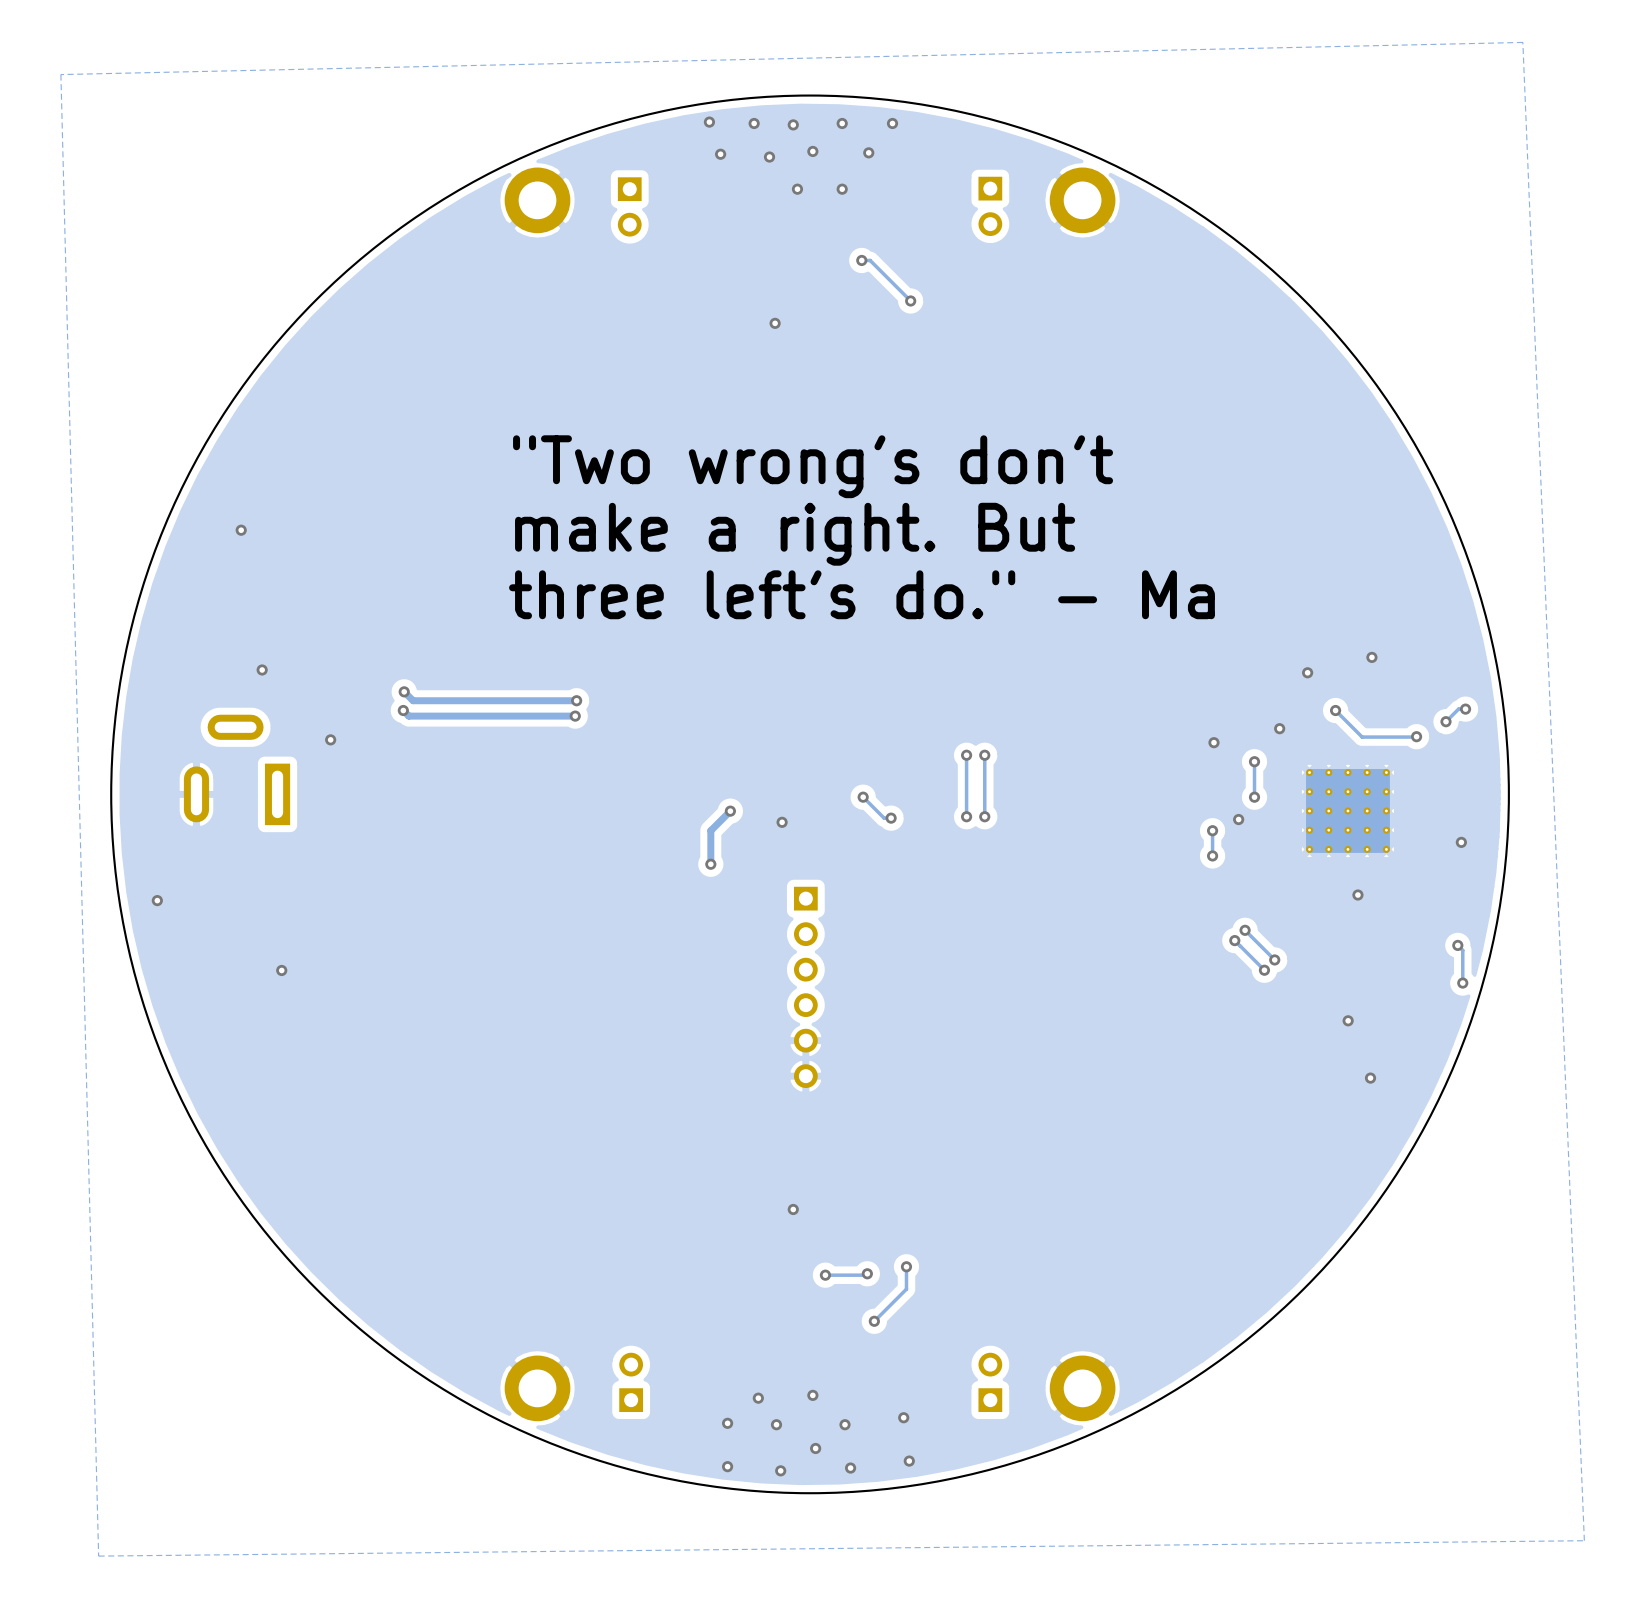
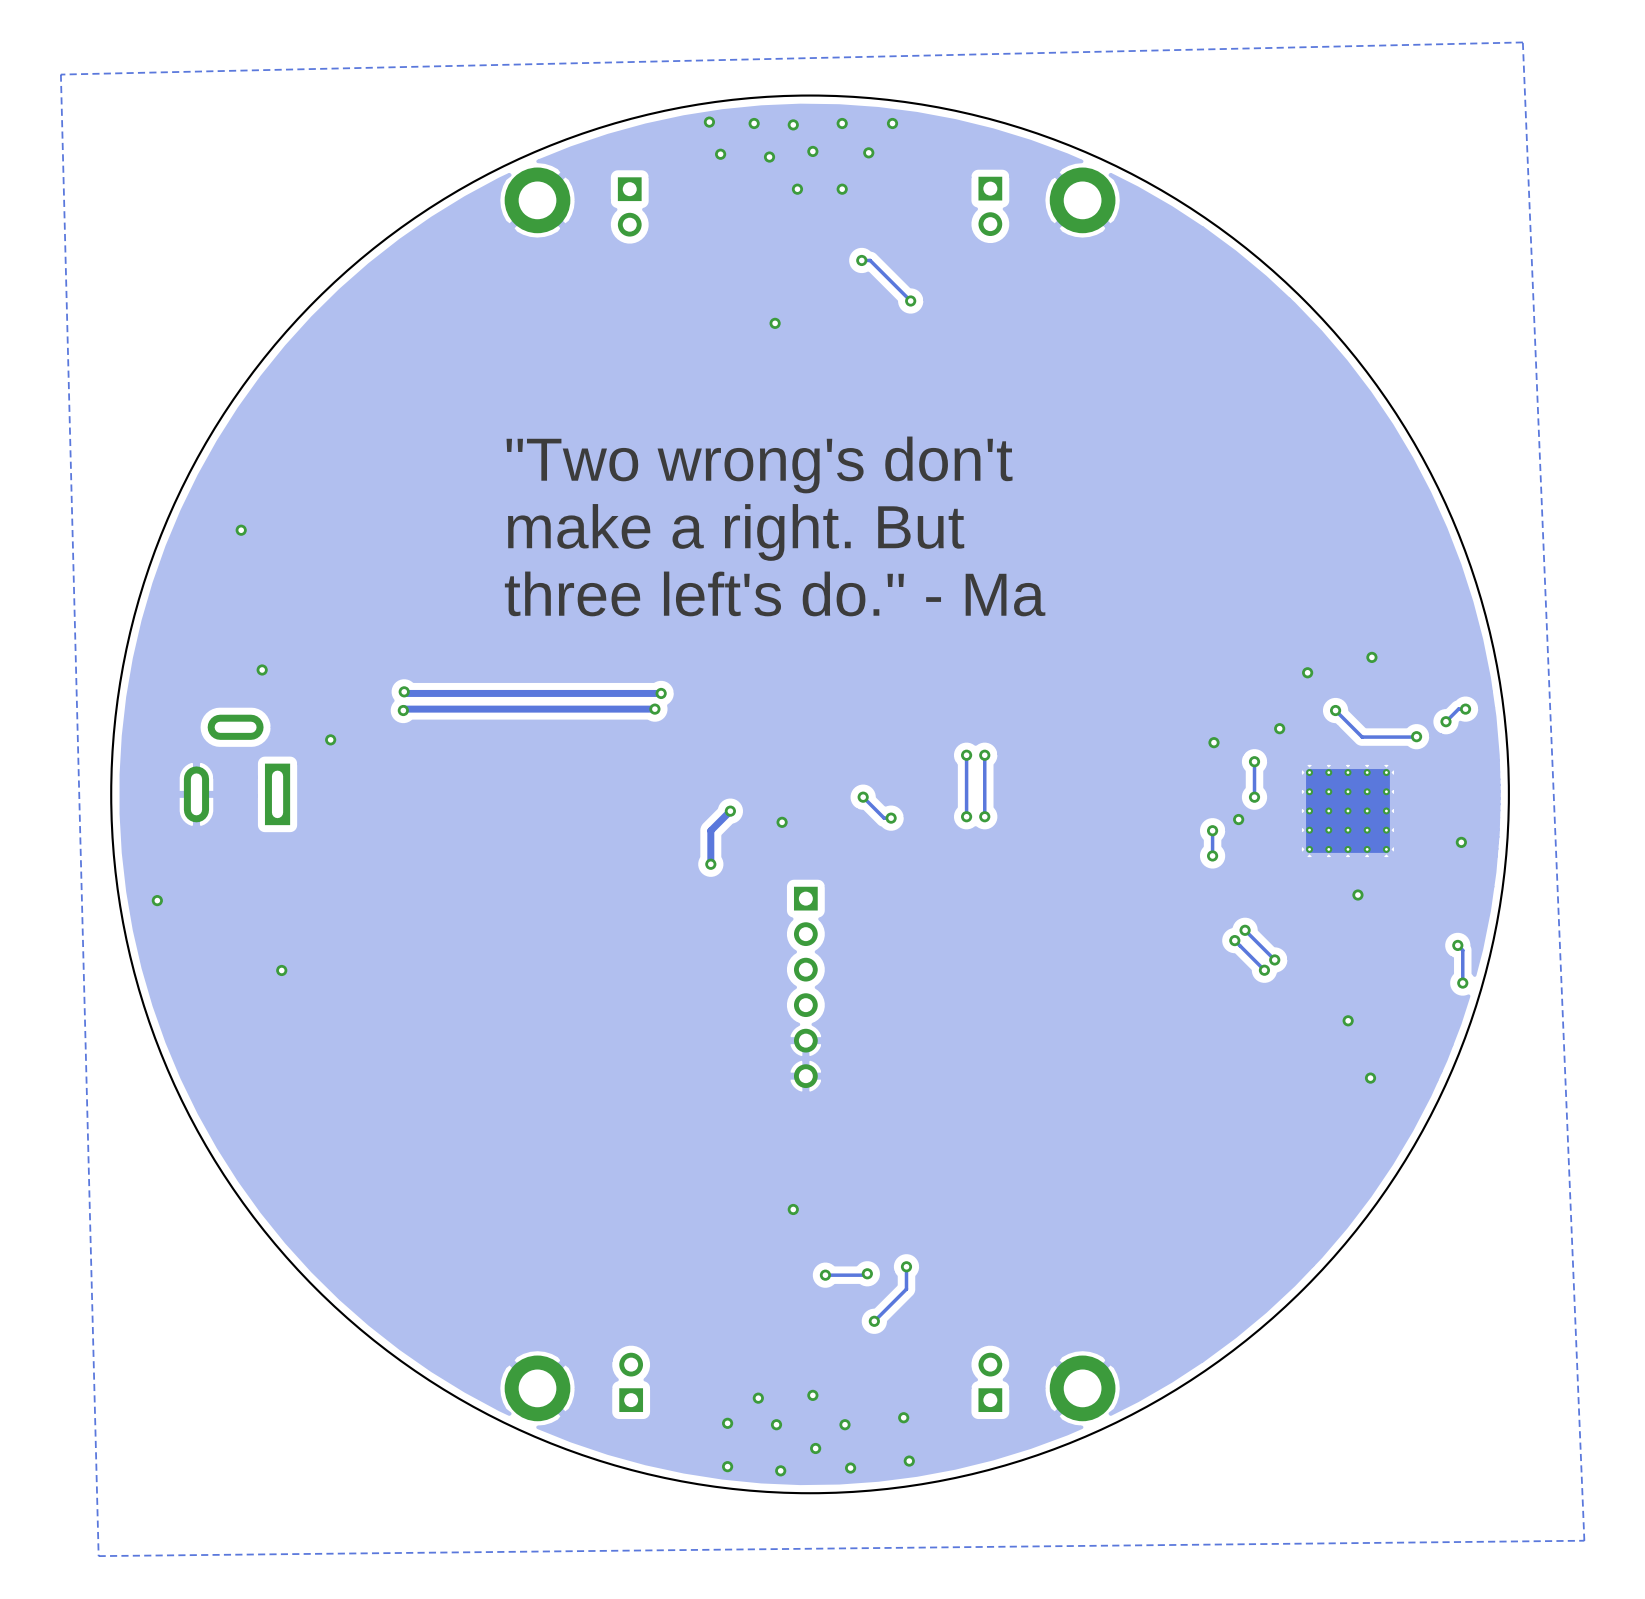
track: (405, 693) (413, 700) (576, 700) -> (405, 693) (661, 693)
via: none -> (661, 693)
via: (576, 700) -> none
via: none -> (654, 709)
track: (403, 710) (408, 716) (575, 716) -> (403, 710) (654, 709)
via: (575, 716) -> none

